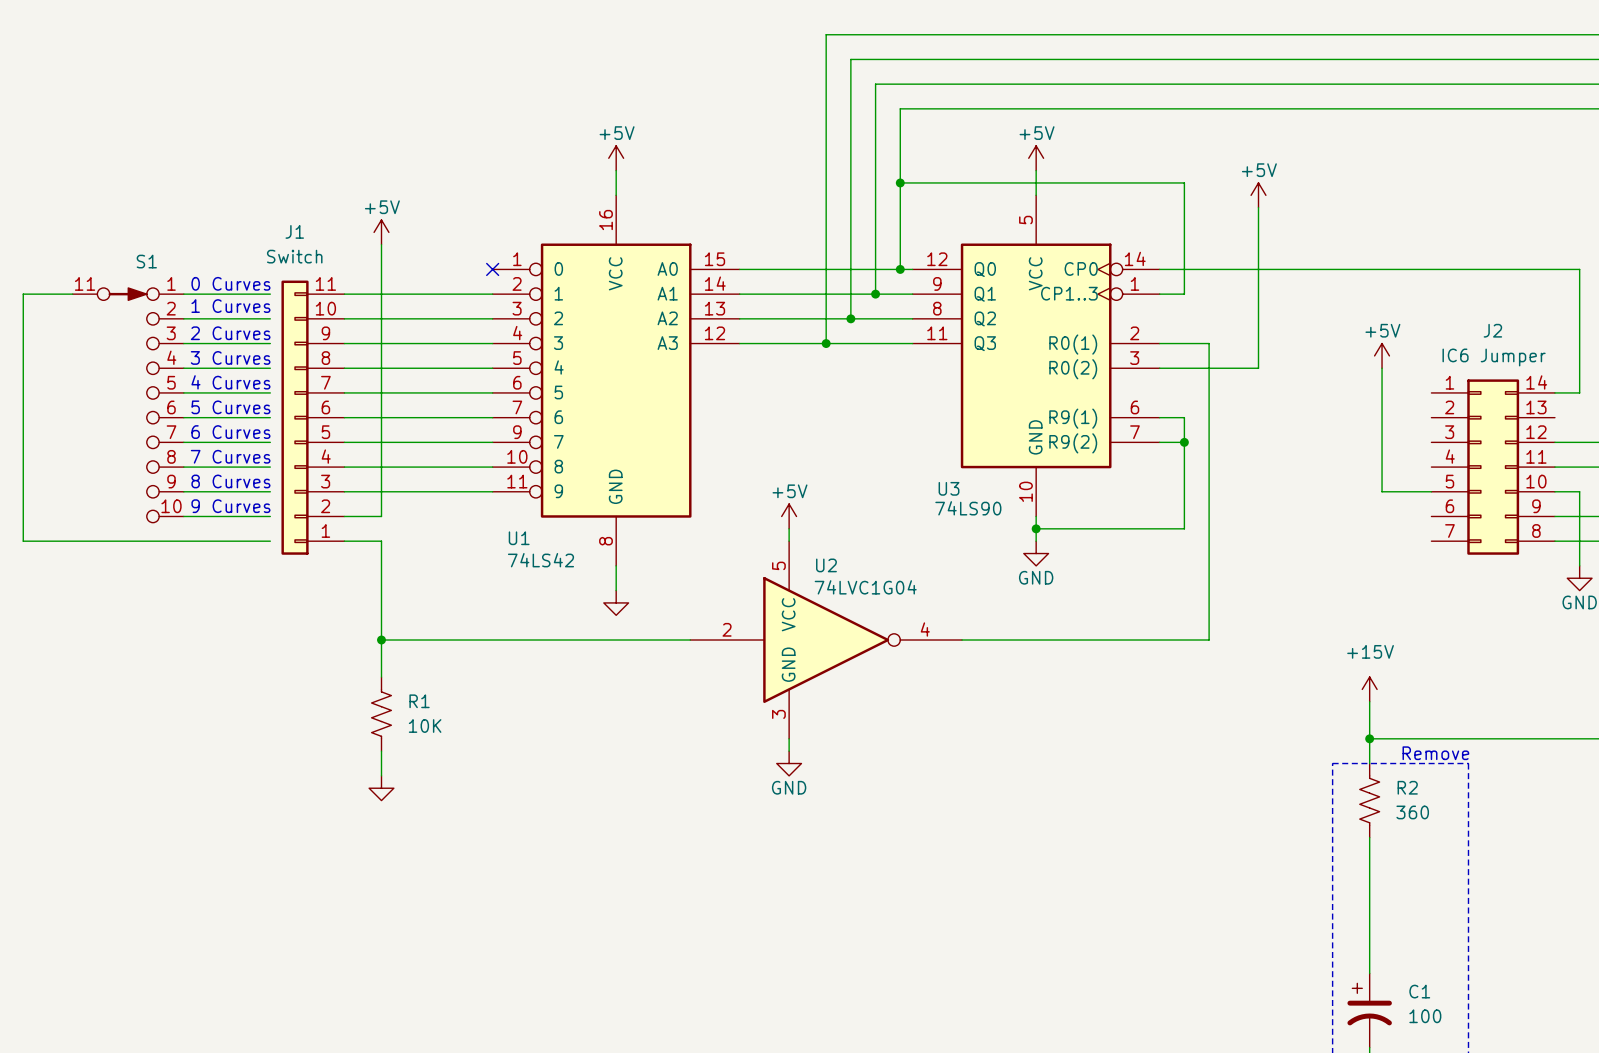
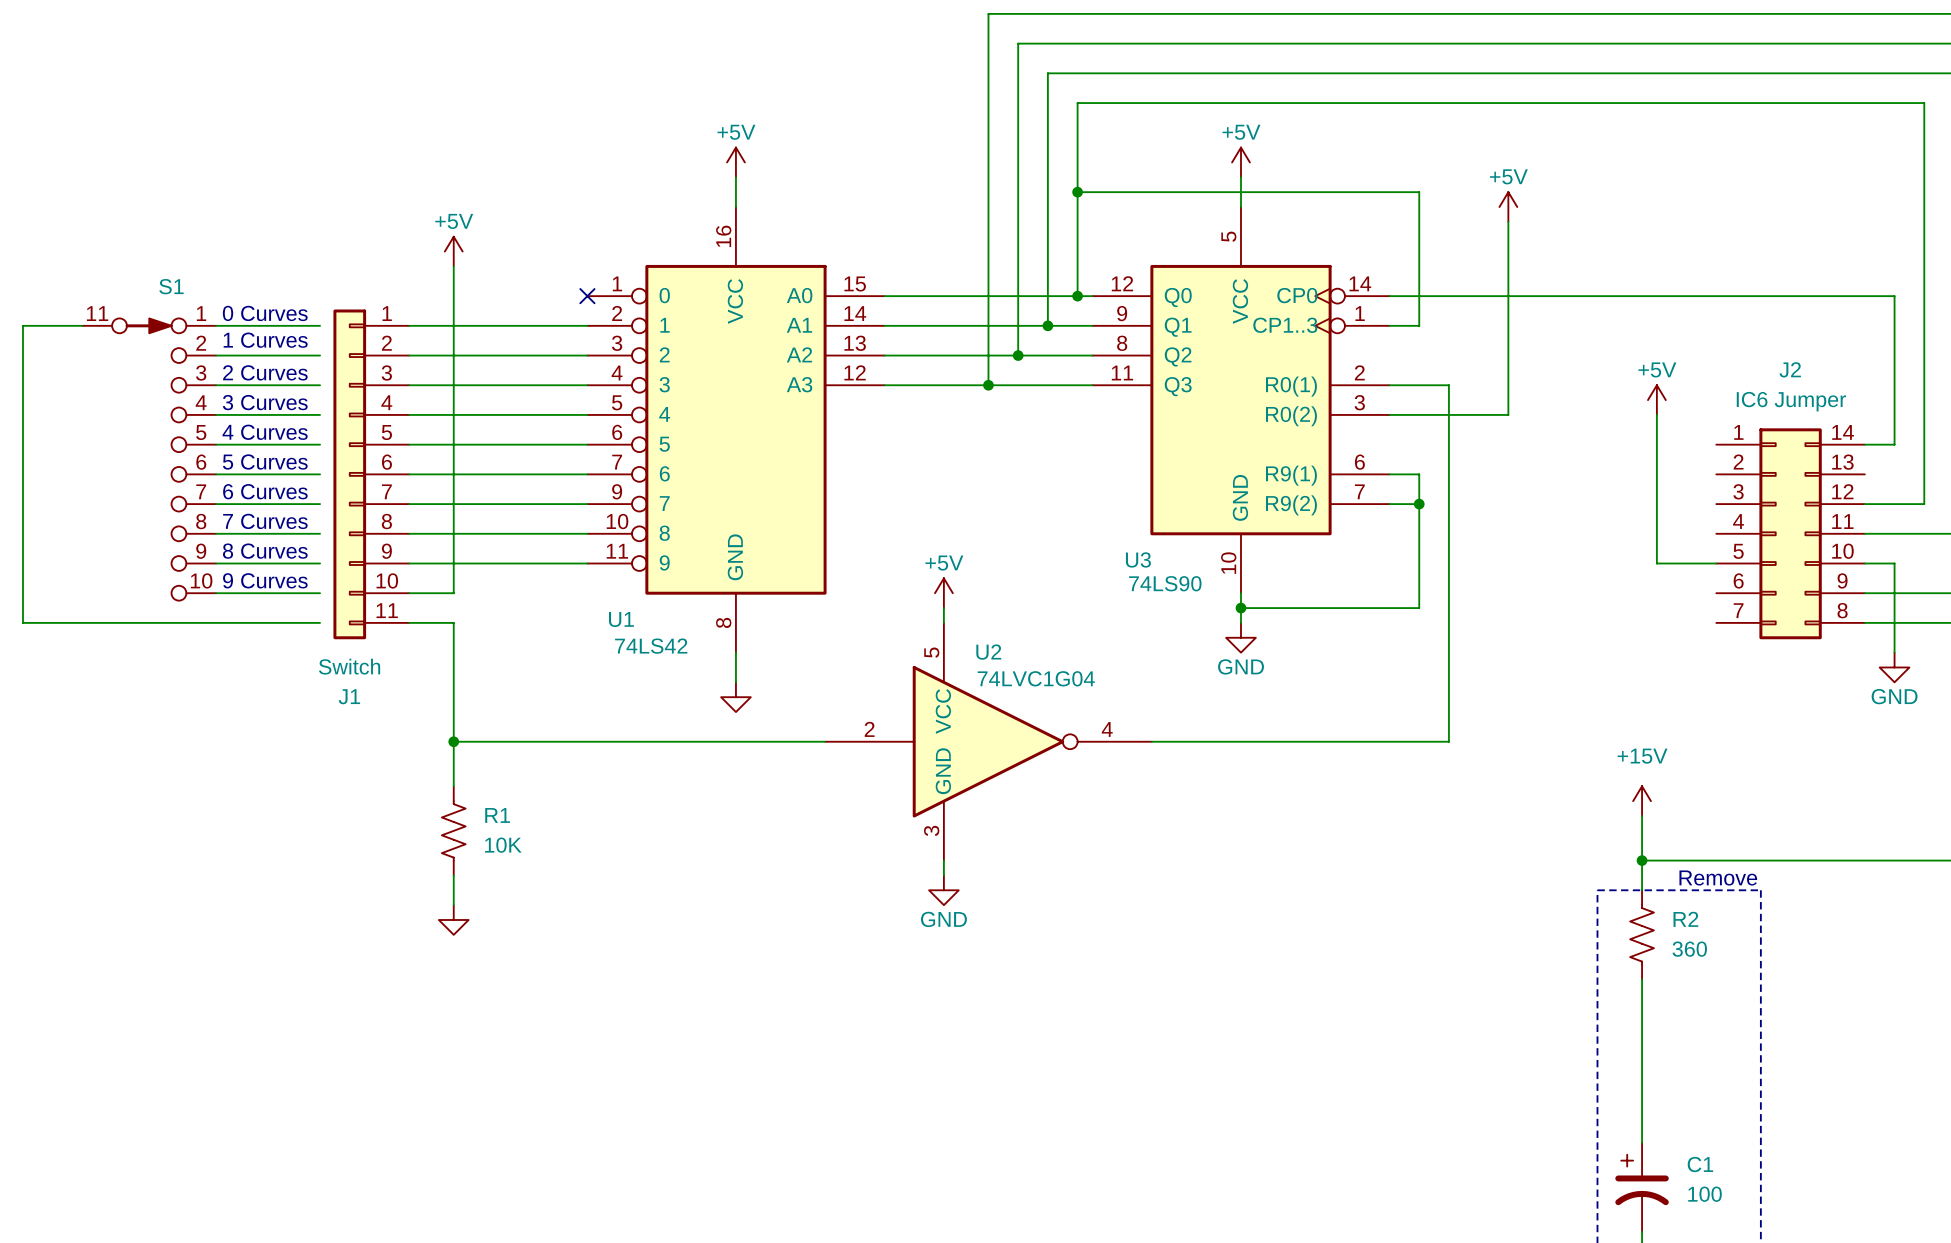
J1 flip: as is (295, 417) -> up-down (349, 474)

